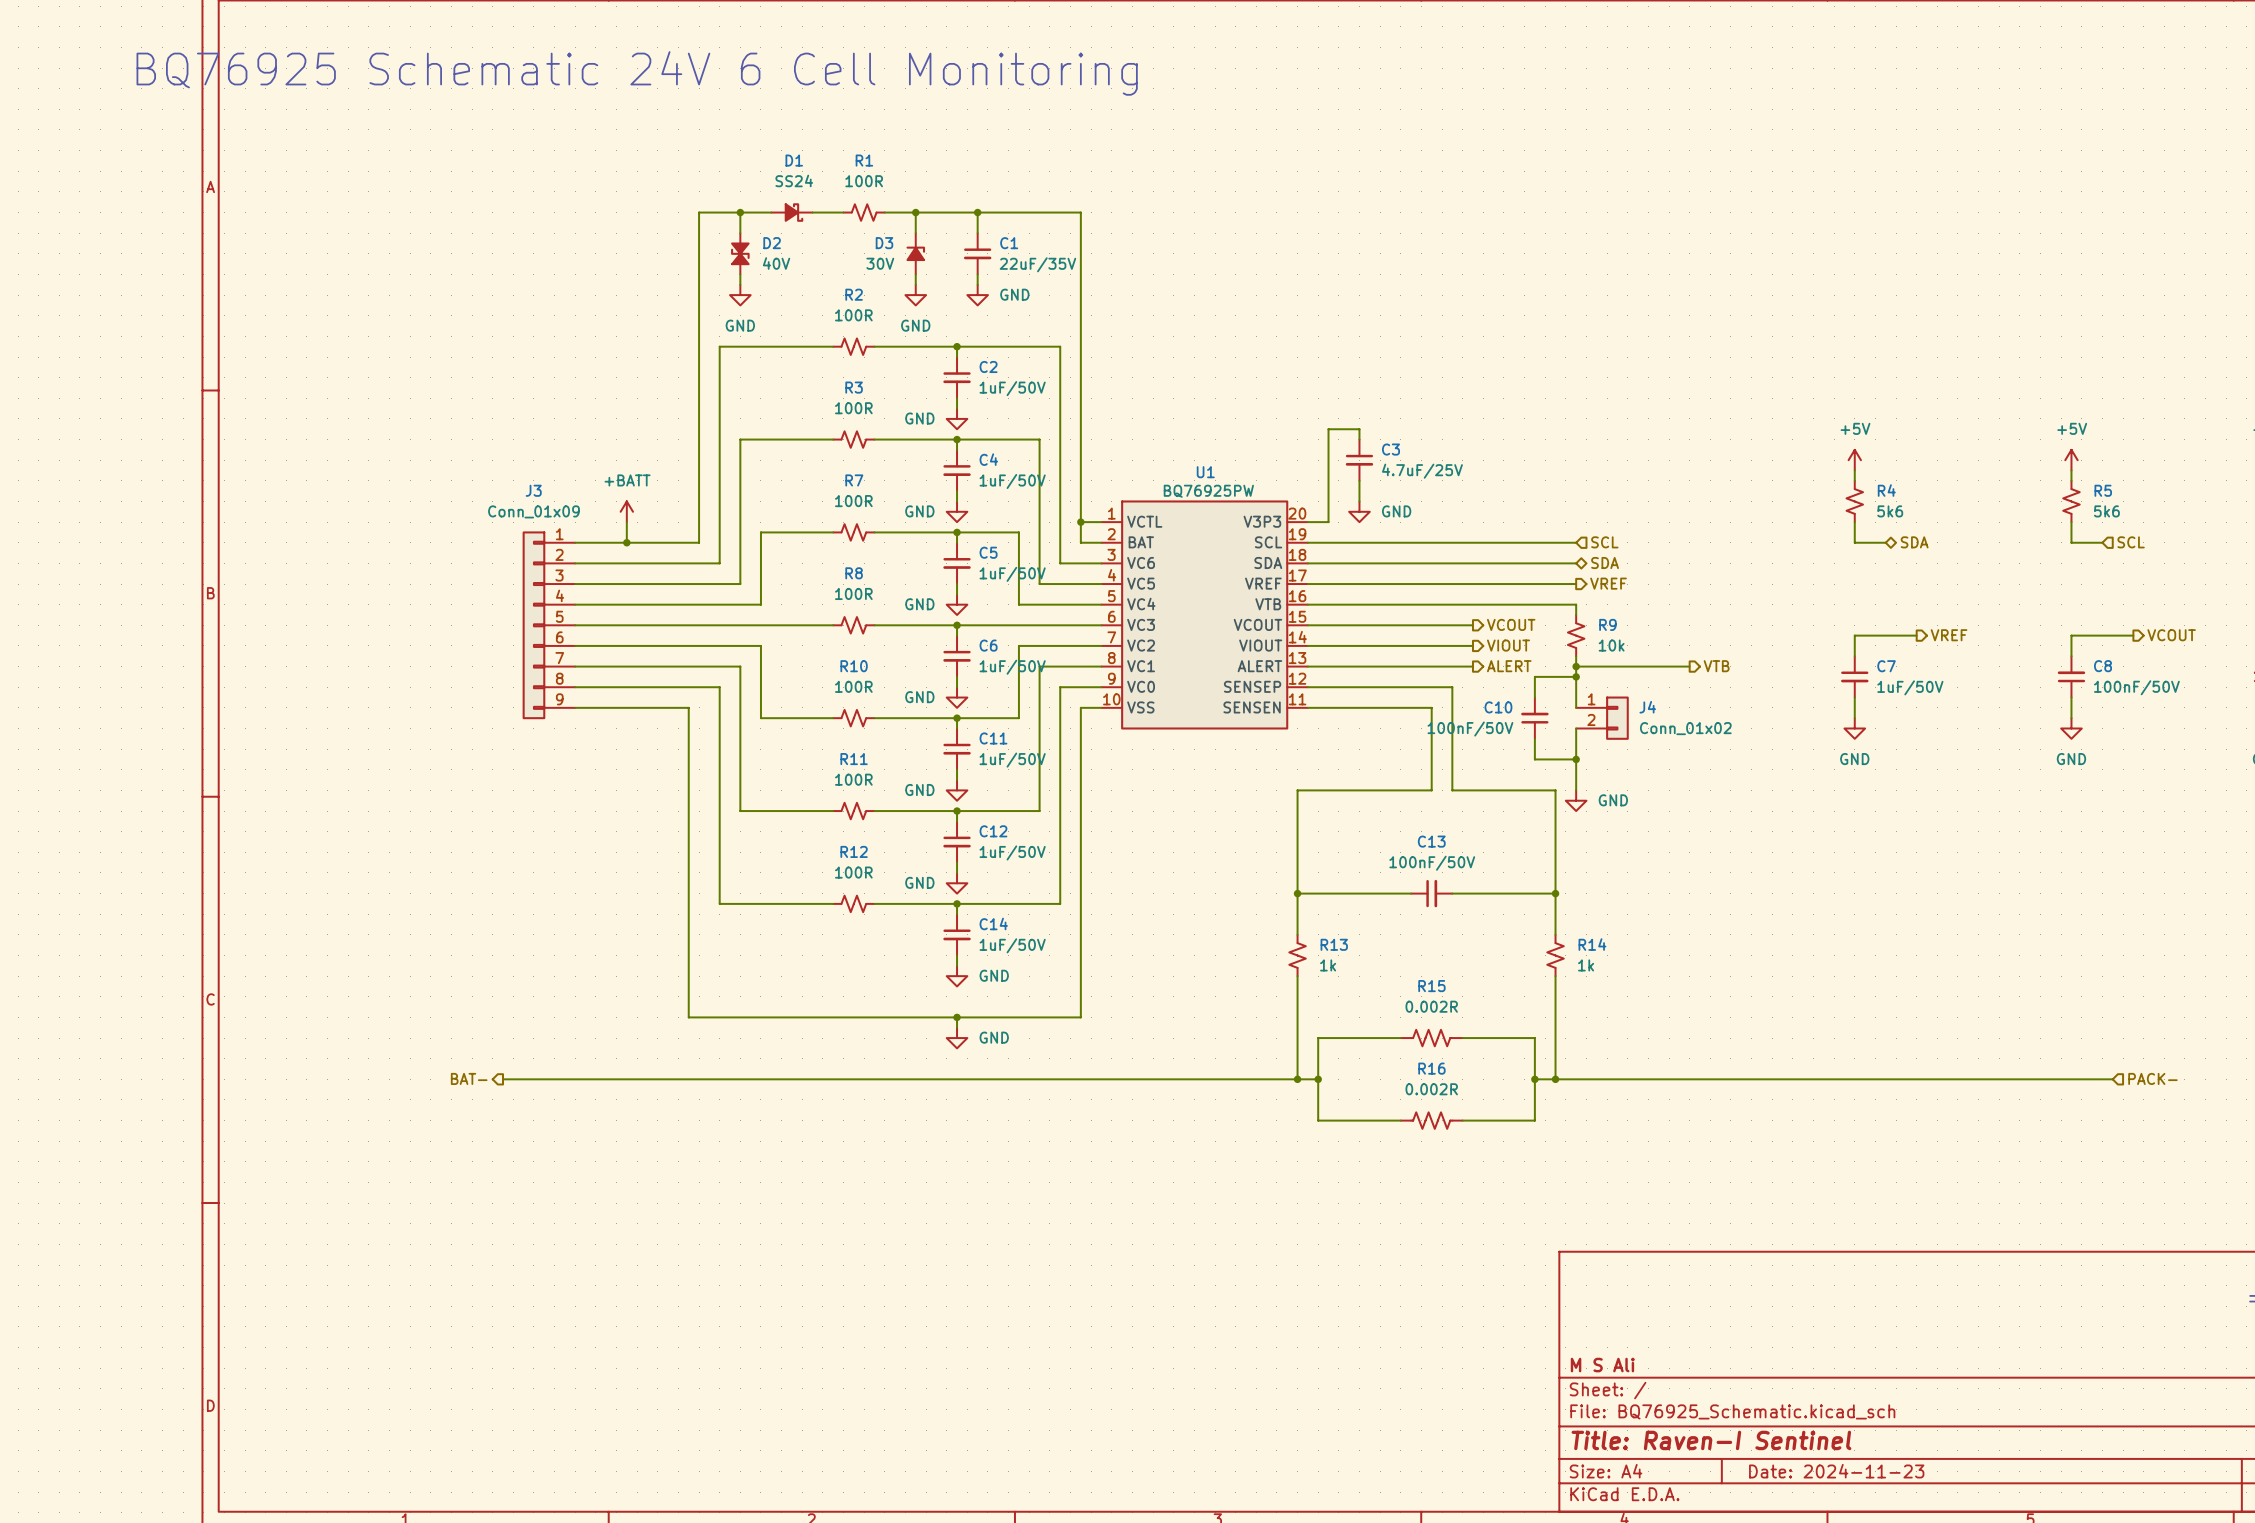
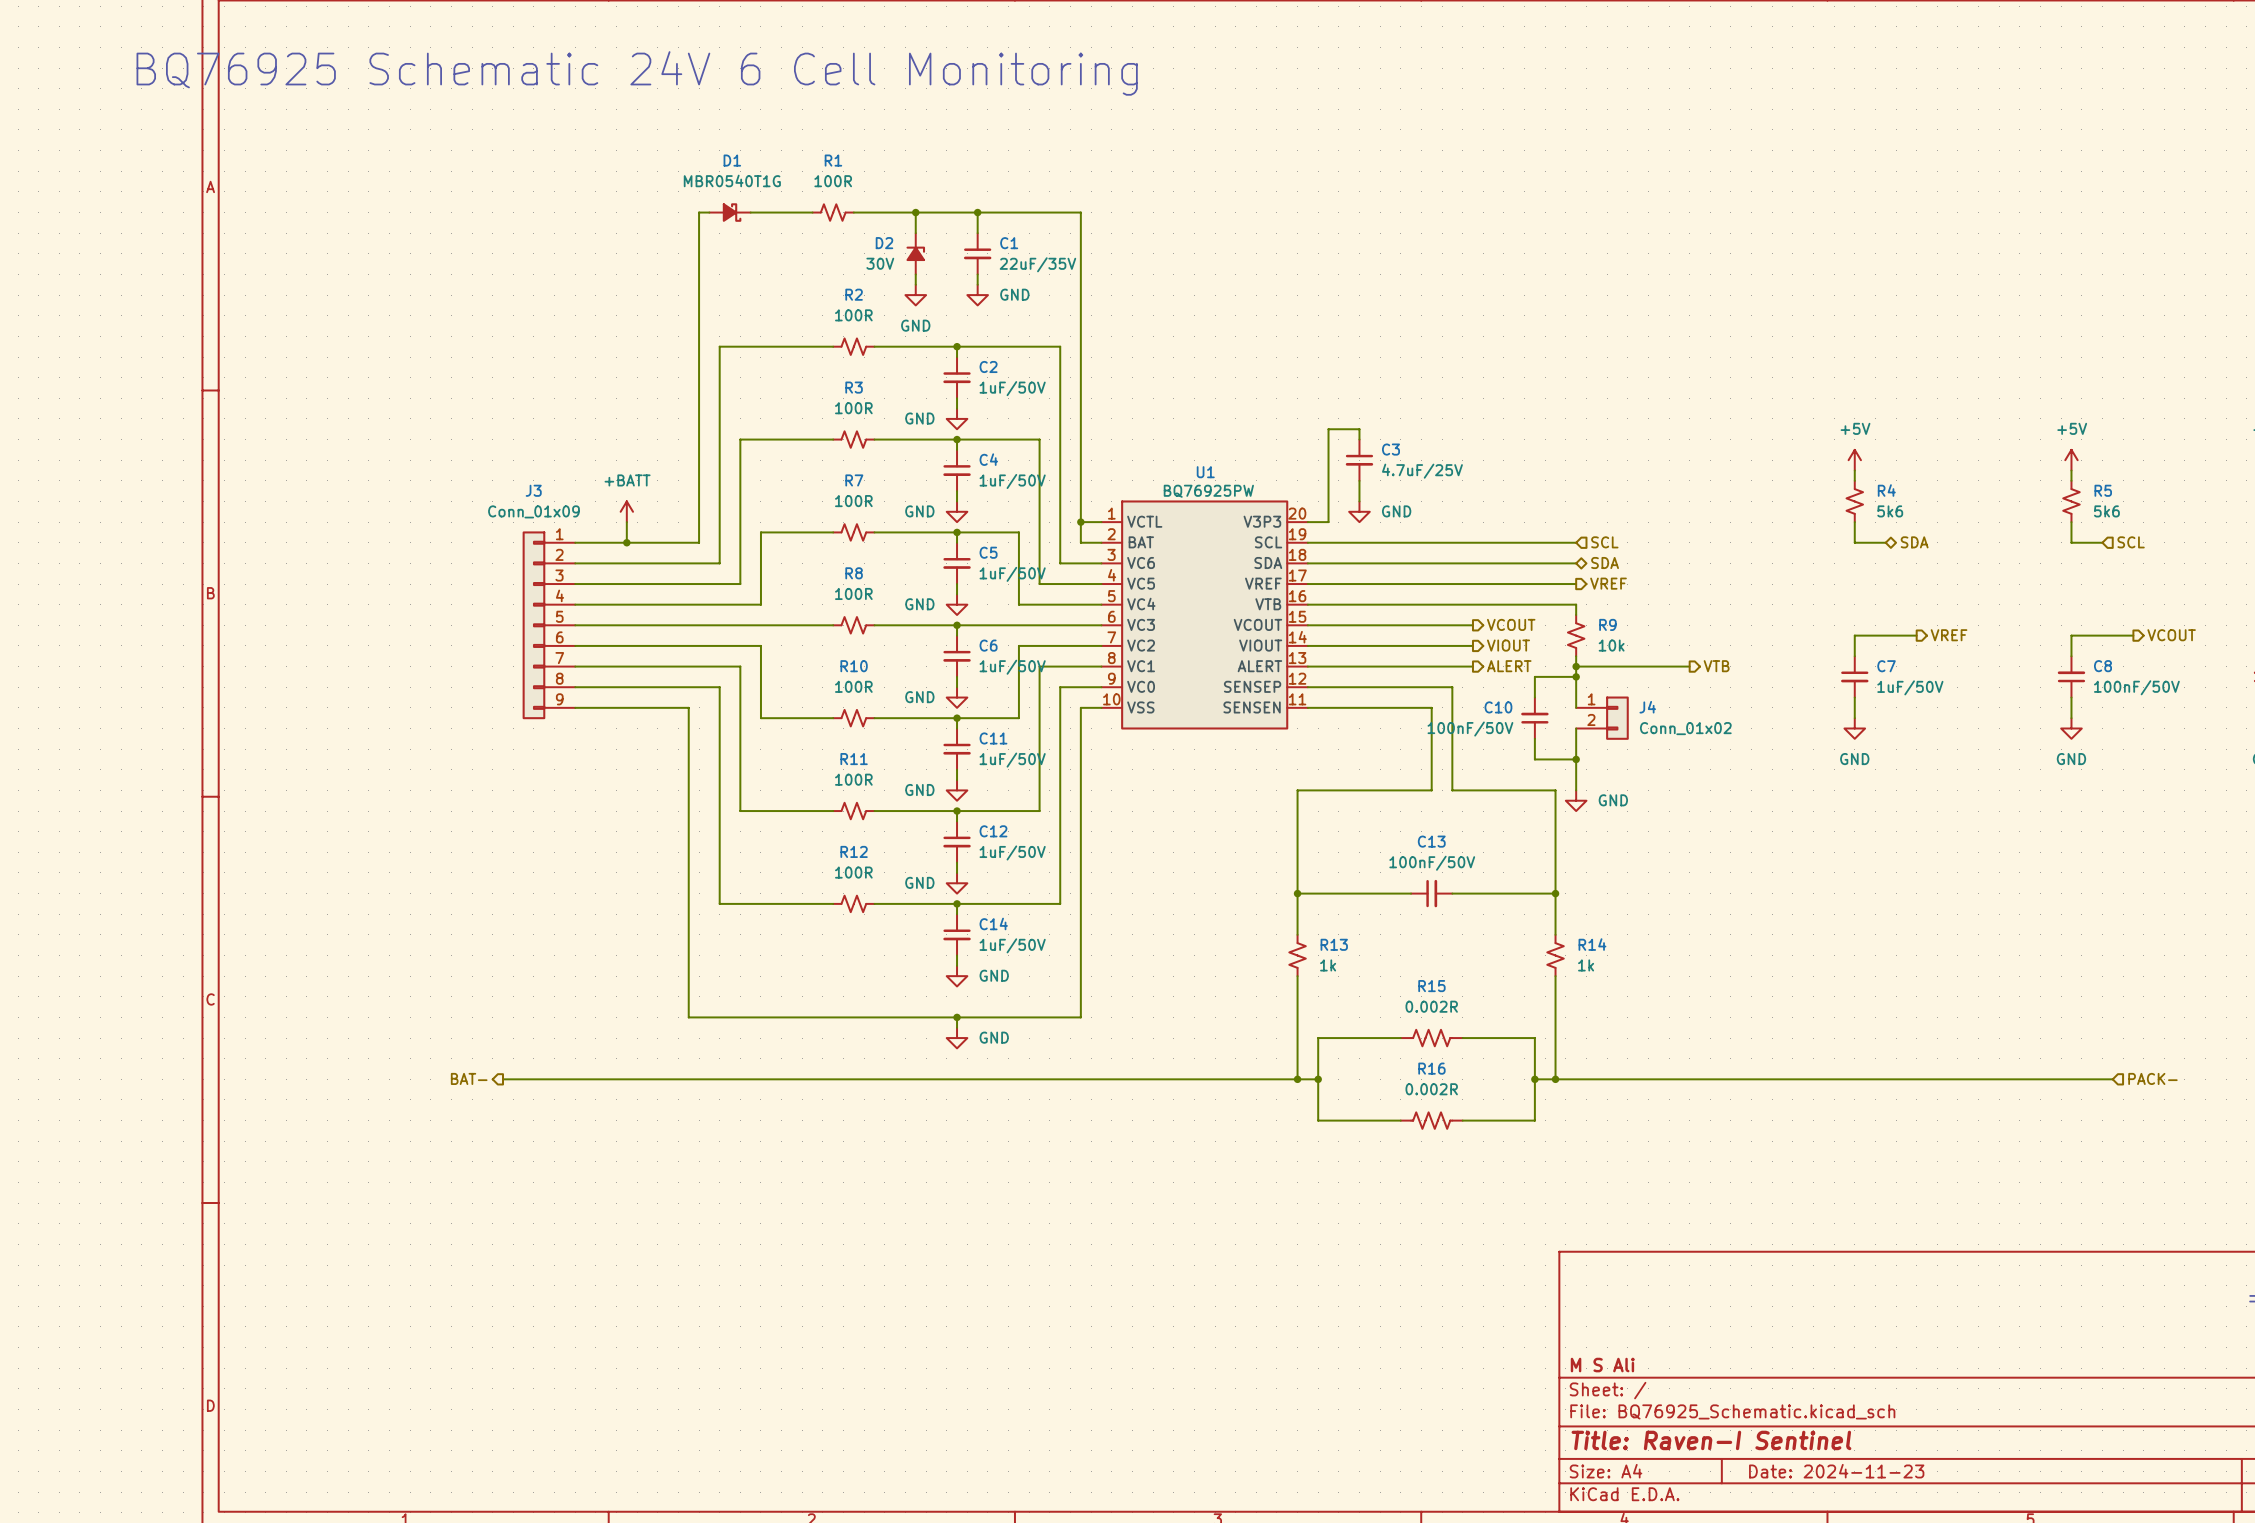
D1 value: SS24 (794, 180) -> MBR0540T1G (732, 180)
wire: (740, 212) (740, 233) -> none
junction: (740, 212) -> none
D1 position: (791, 212) -> (730, 212)
R1 position: (864, 212) -> (833, 212)
D3 name: D3 (884, 243) -> D2 (884, 243)
D2: 40V (740, 253) -> none
wire: (740, 274) (740, 284) -> none
power symbol: GND (740, 295) -> none

